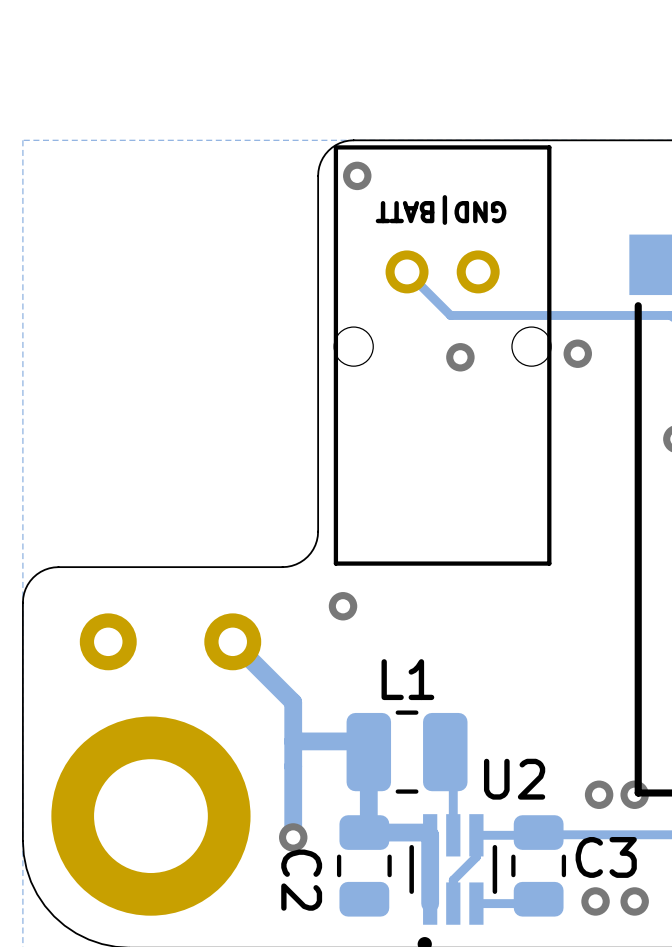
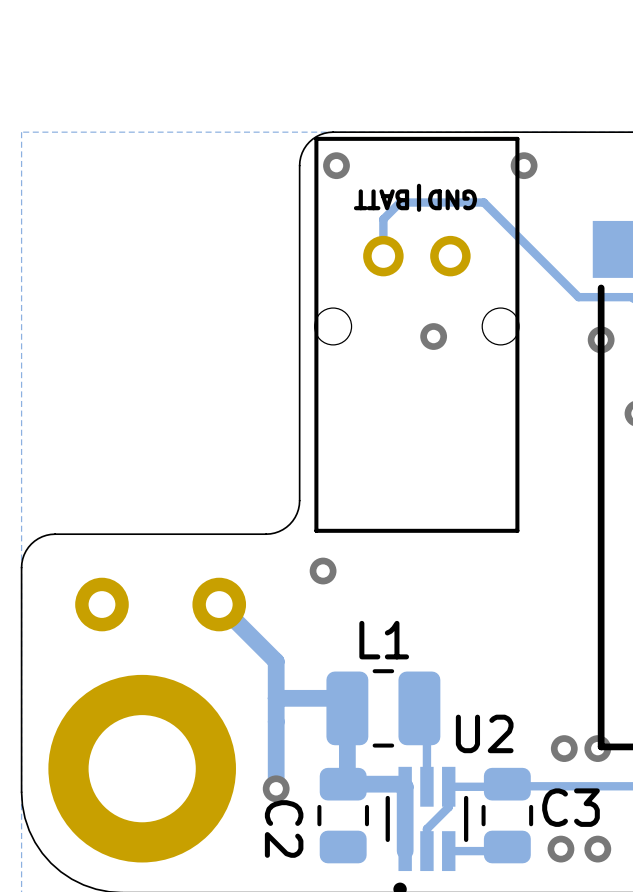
via: none -> (524, 165)
track: (407, 271) (450, 315) (614, 315) -> (383, 256) (383, 219) (400, 202) (483, 202) (578, 297)
via position: (577, 353) -> (601, 339)

